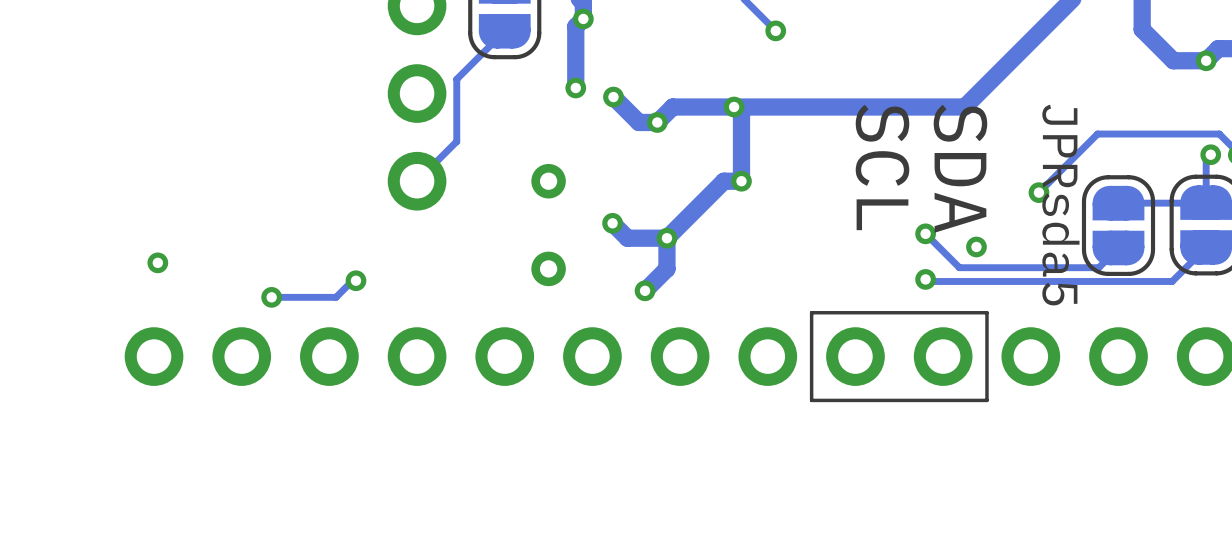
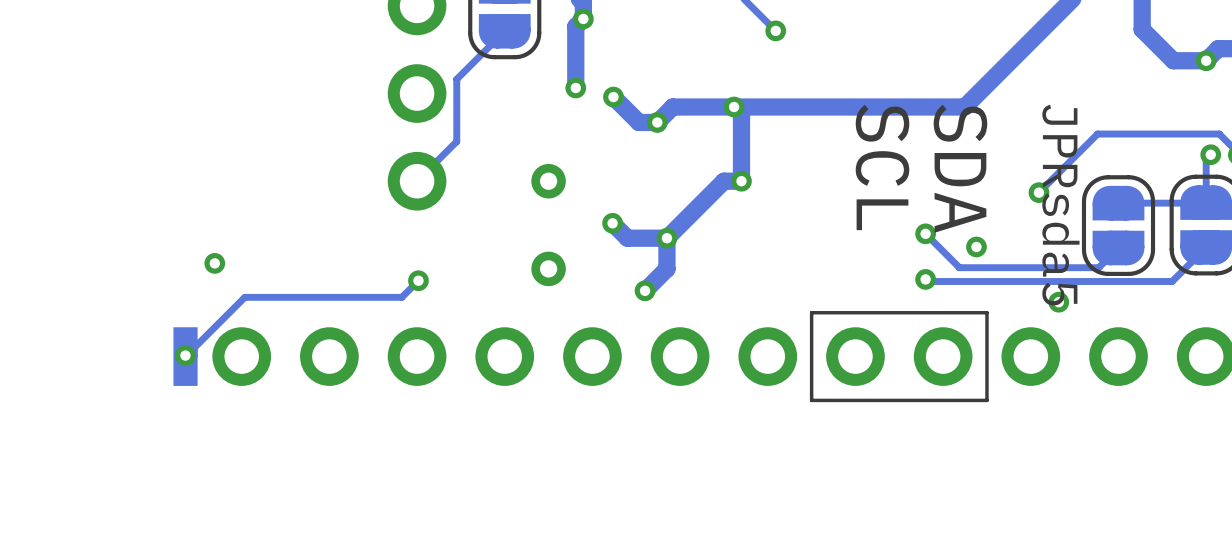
via: (157, 262) -> none
via: none -> (214, 263)
track: (355, 280) (352, 280) (336, 297) -> (418, 280) (401, 297) (336, 297)
via position: (355, 280) -> (418, 280)
track: none -> (271, 297) (244, 297) (194, 348) (194, 356)
via: (271, 297) -> none
via: none -> (1058, 302)
part footprint: [124, 327, 973, 386] -> [173, 327, 973, 386]
via: none -> (185, 355)

